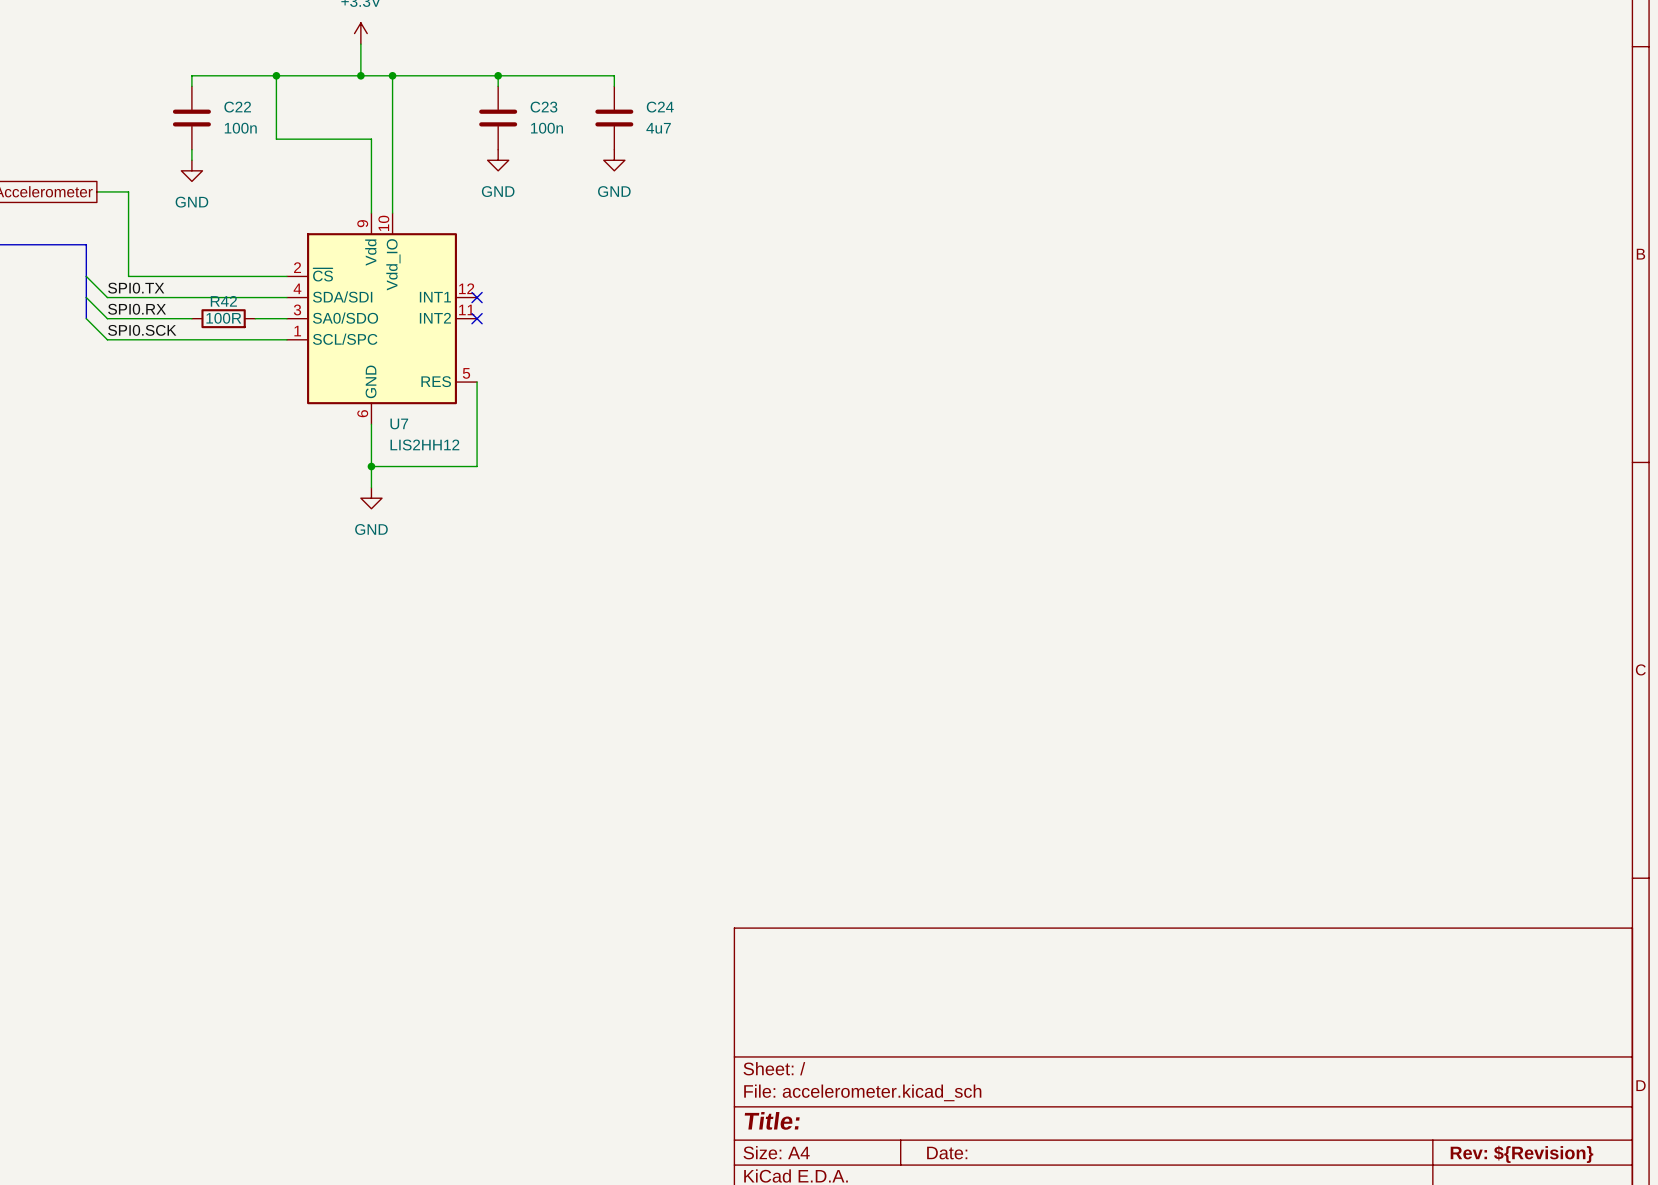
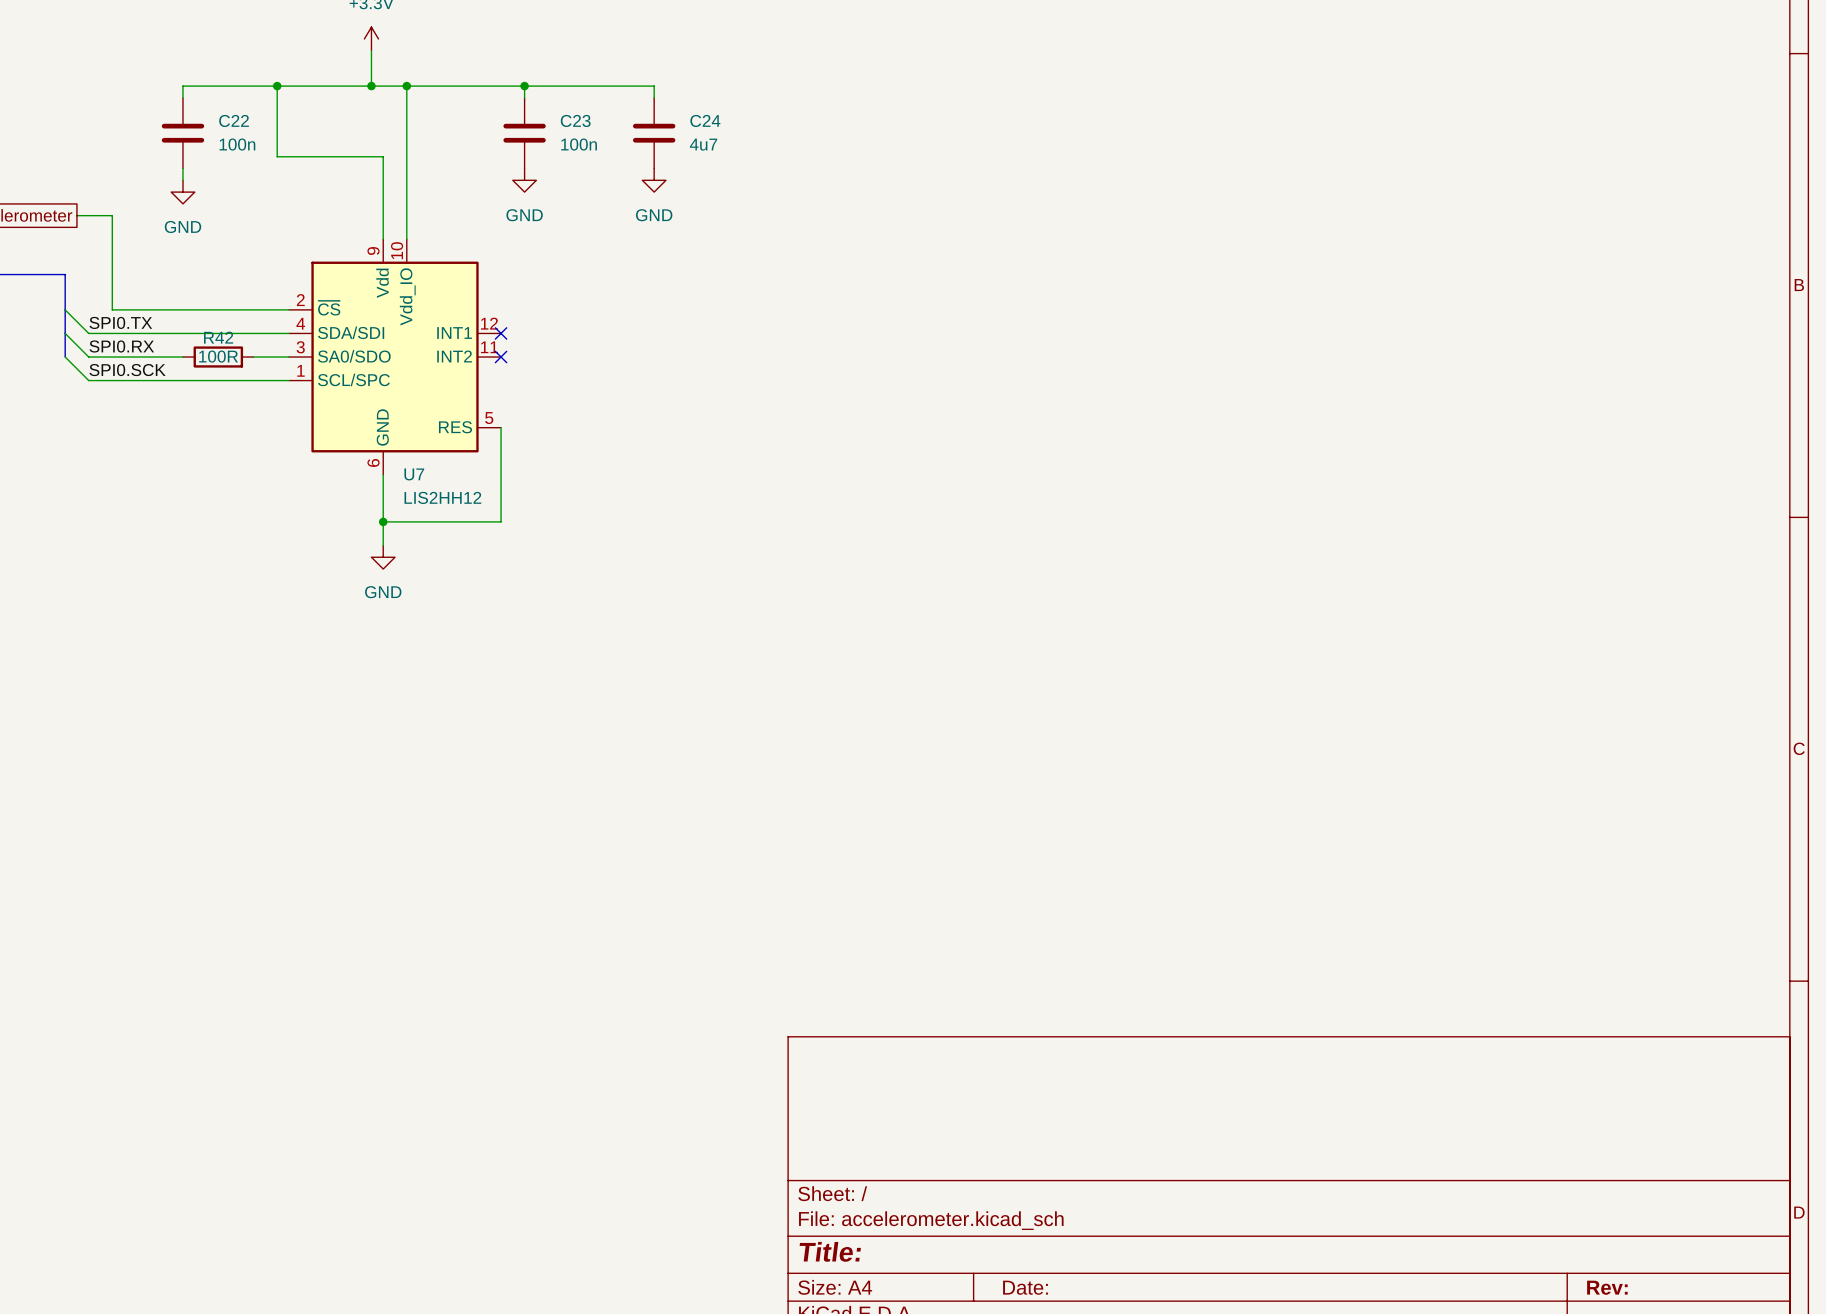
title block: Rev: ${Revision} (1522, 1154) -> Rev: (1607, 1287)

